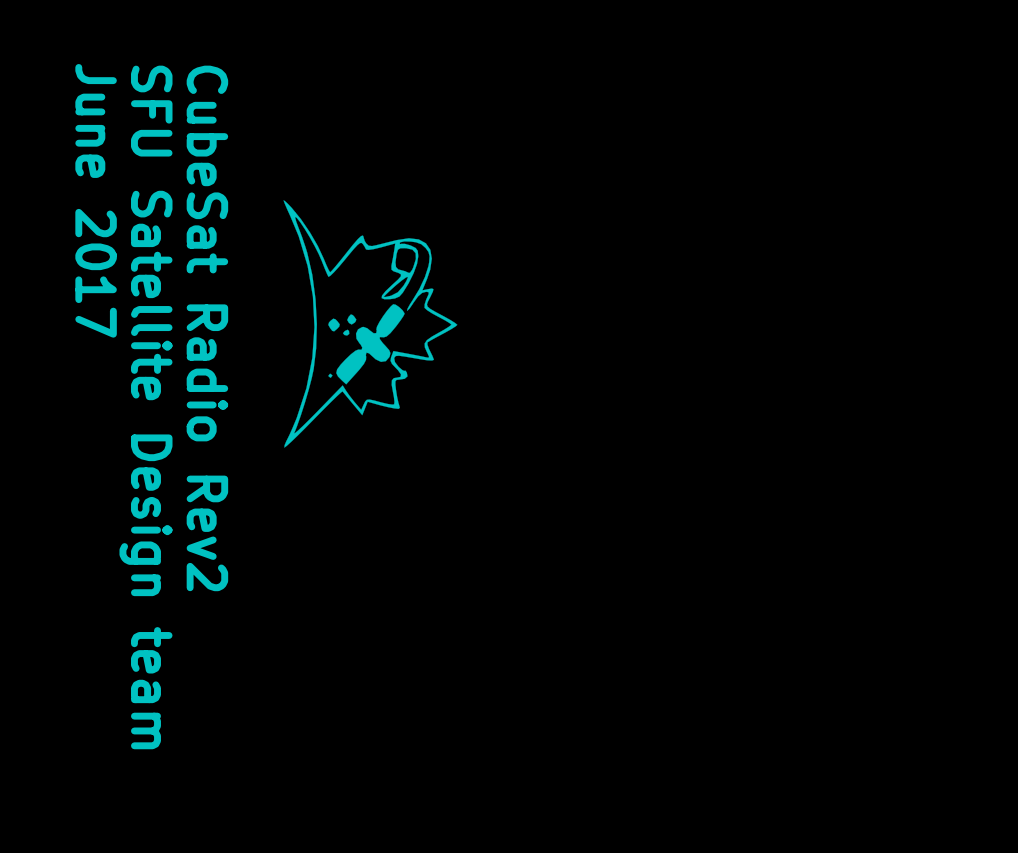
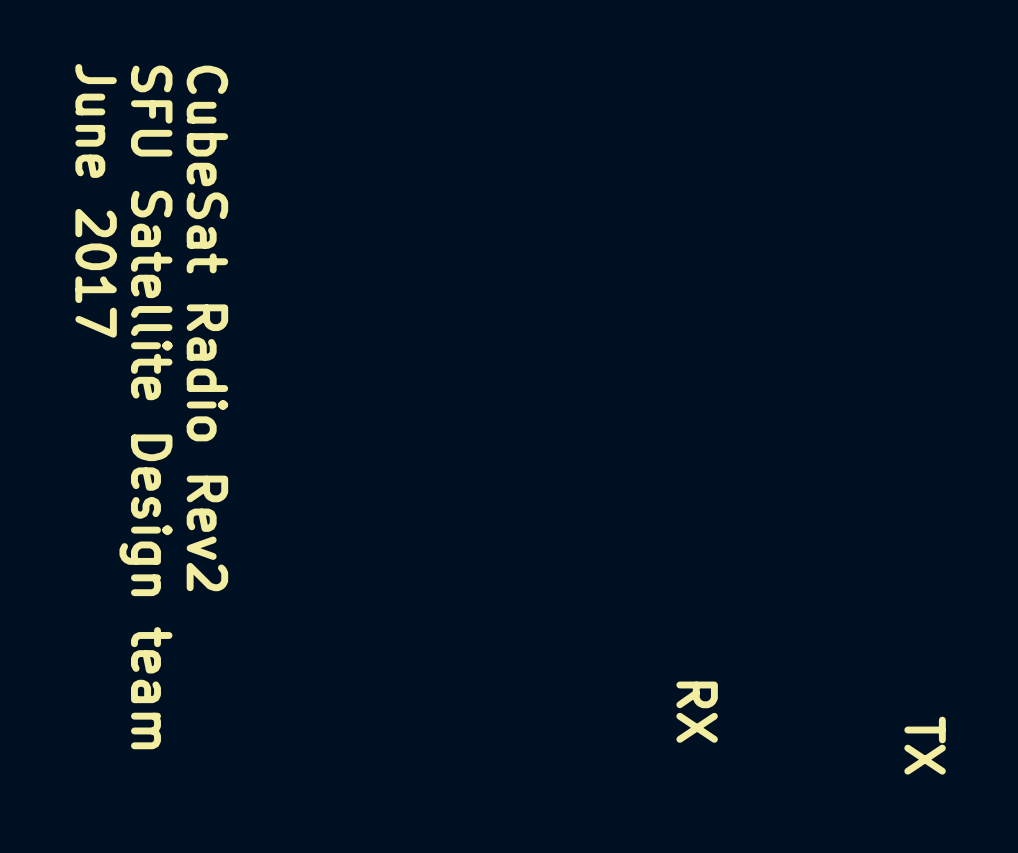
drawing: [283, 200, 458, 448] -> none
text: none -> RX (697, 712)
text: none -> TX (925, 745)

